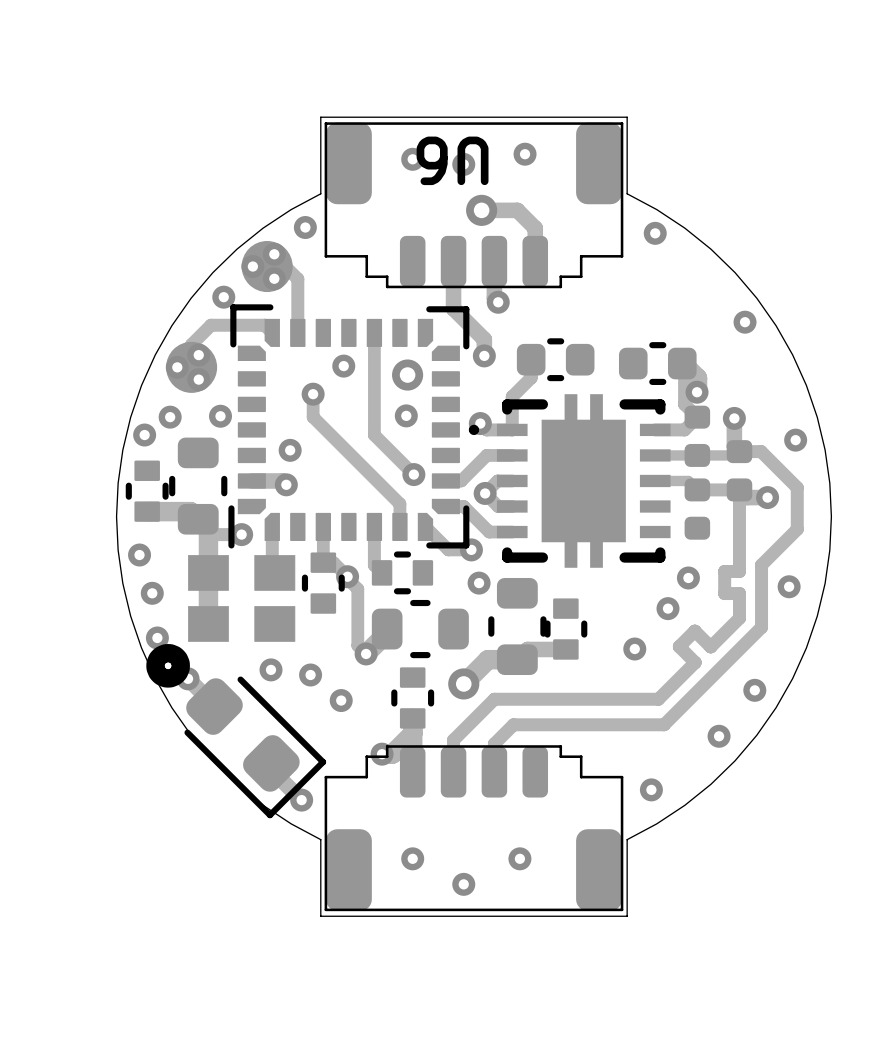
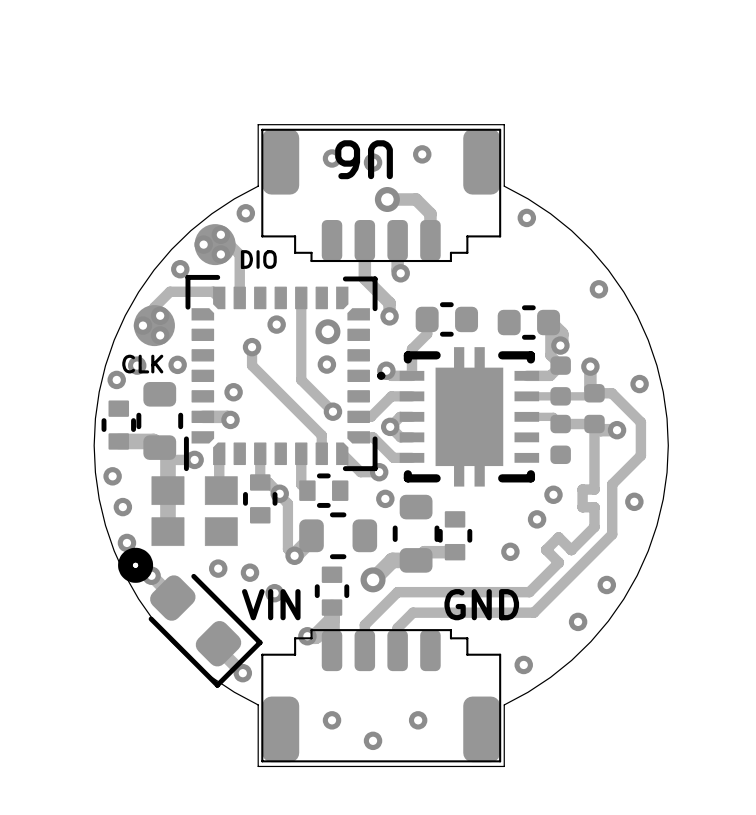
text: none -> DIO (258, 259)
text: none -> CLK (142, 364)
text: none -> VIN (271, 604)
text: none -> GND (481, 604)

